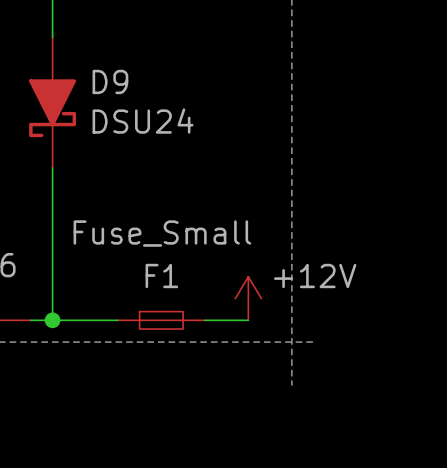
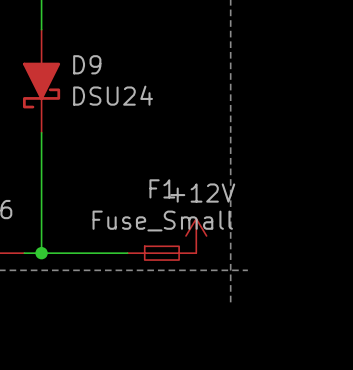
F1 value position: Fuse_Small (162, 233) -> Fuse_Small (162, 221)
F1 name position: F1 (161, 276) -> F1 (162, 188)
power symbol text position: +12V (315, 276) -> +12V (202, 193)
F1 position: (161, 320) -> (161, 253)

